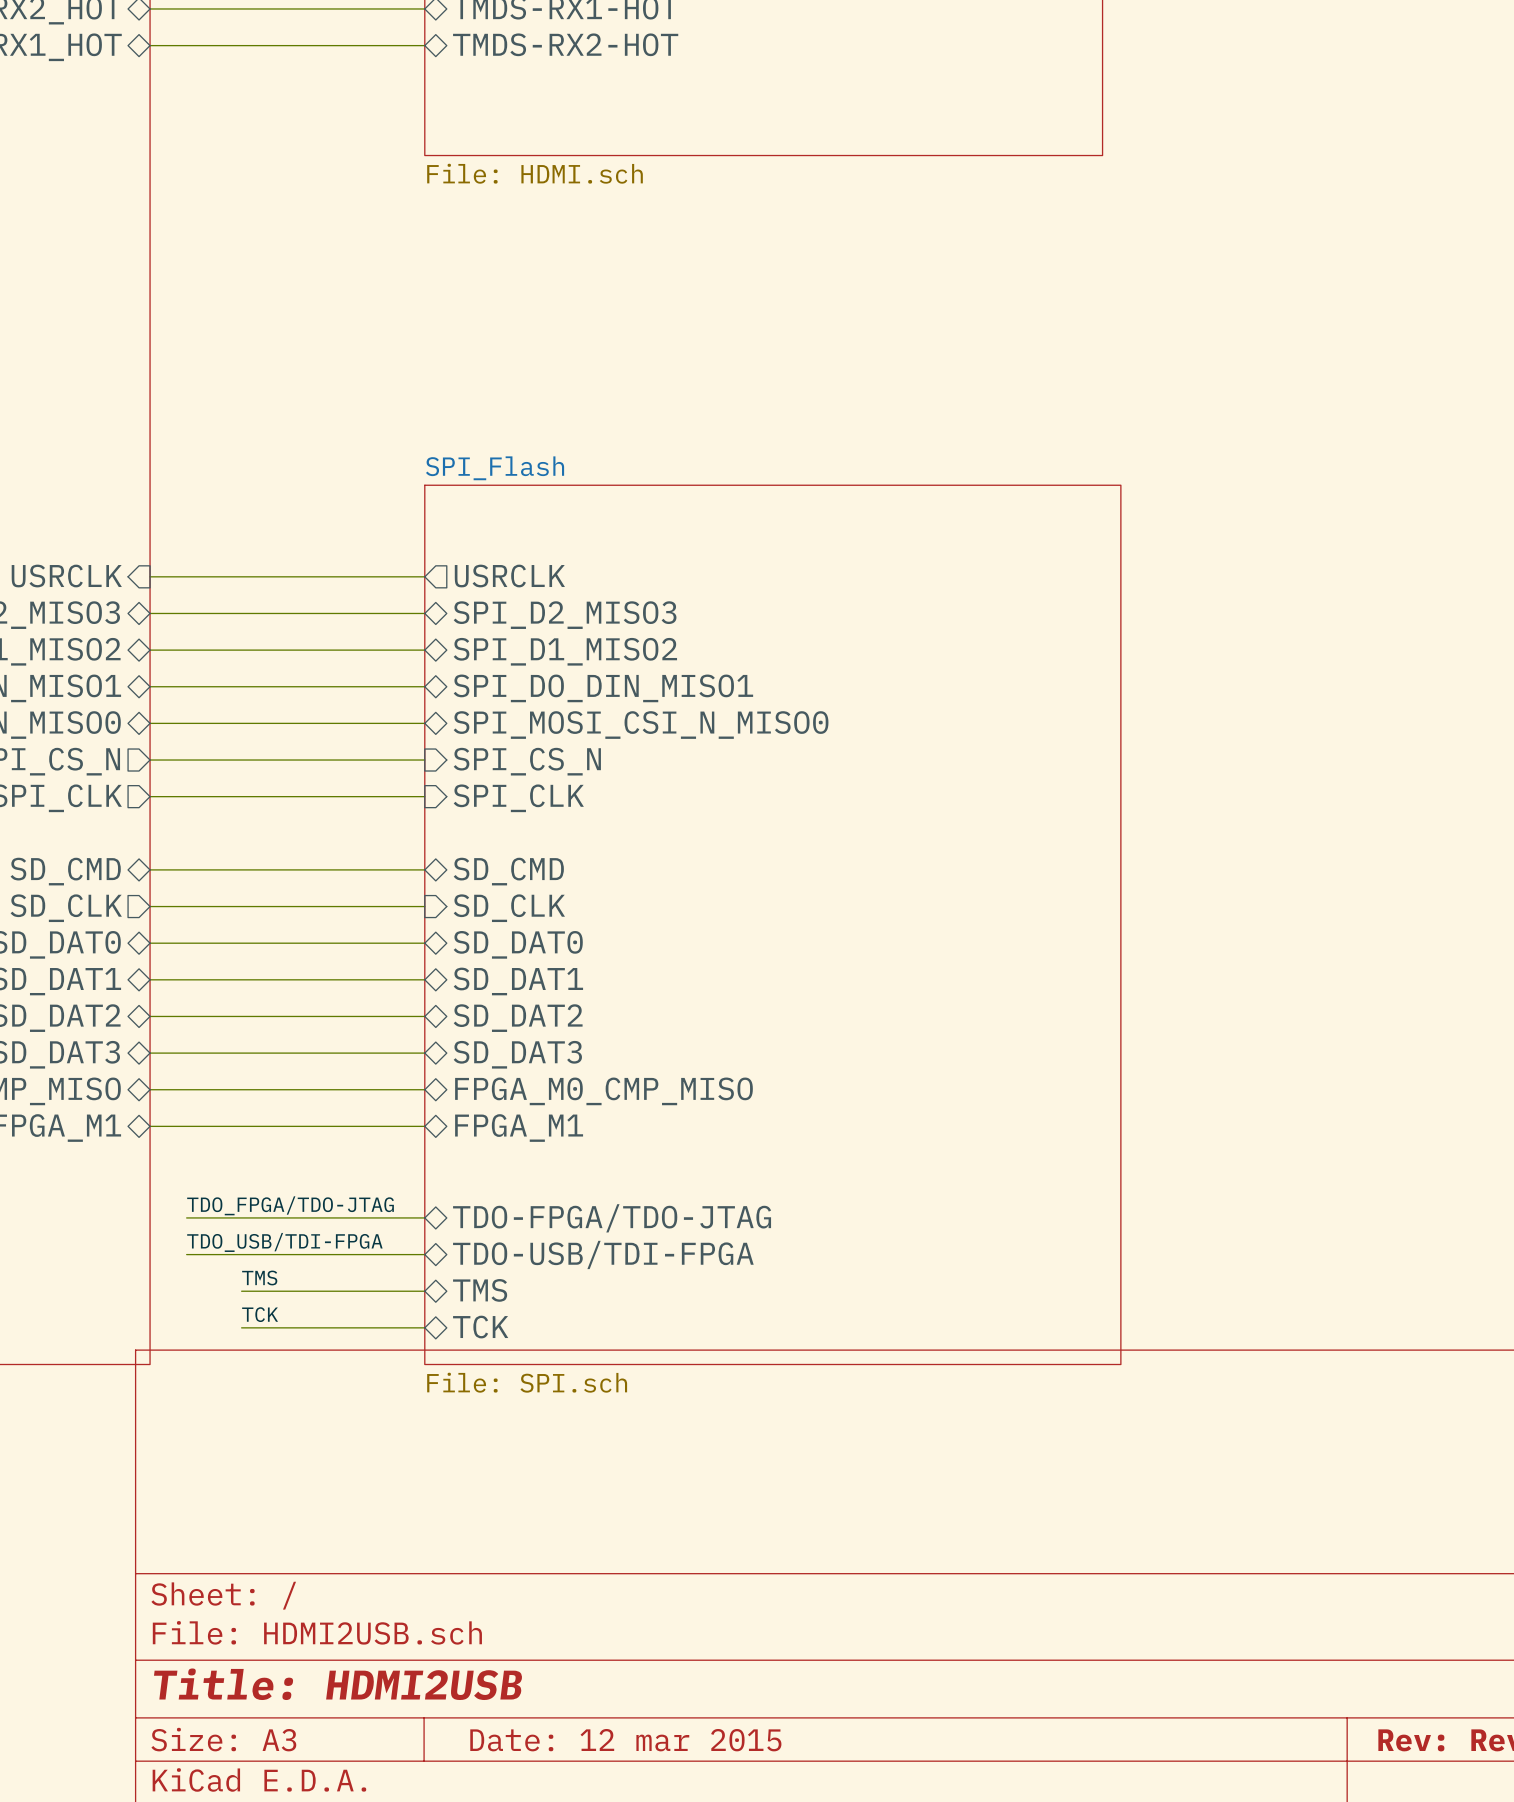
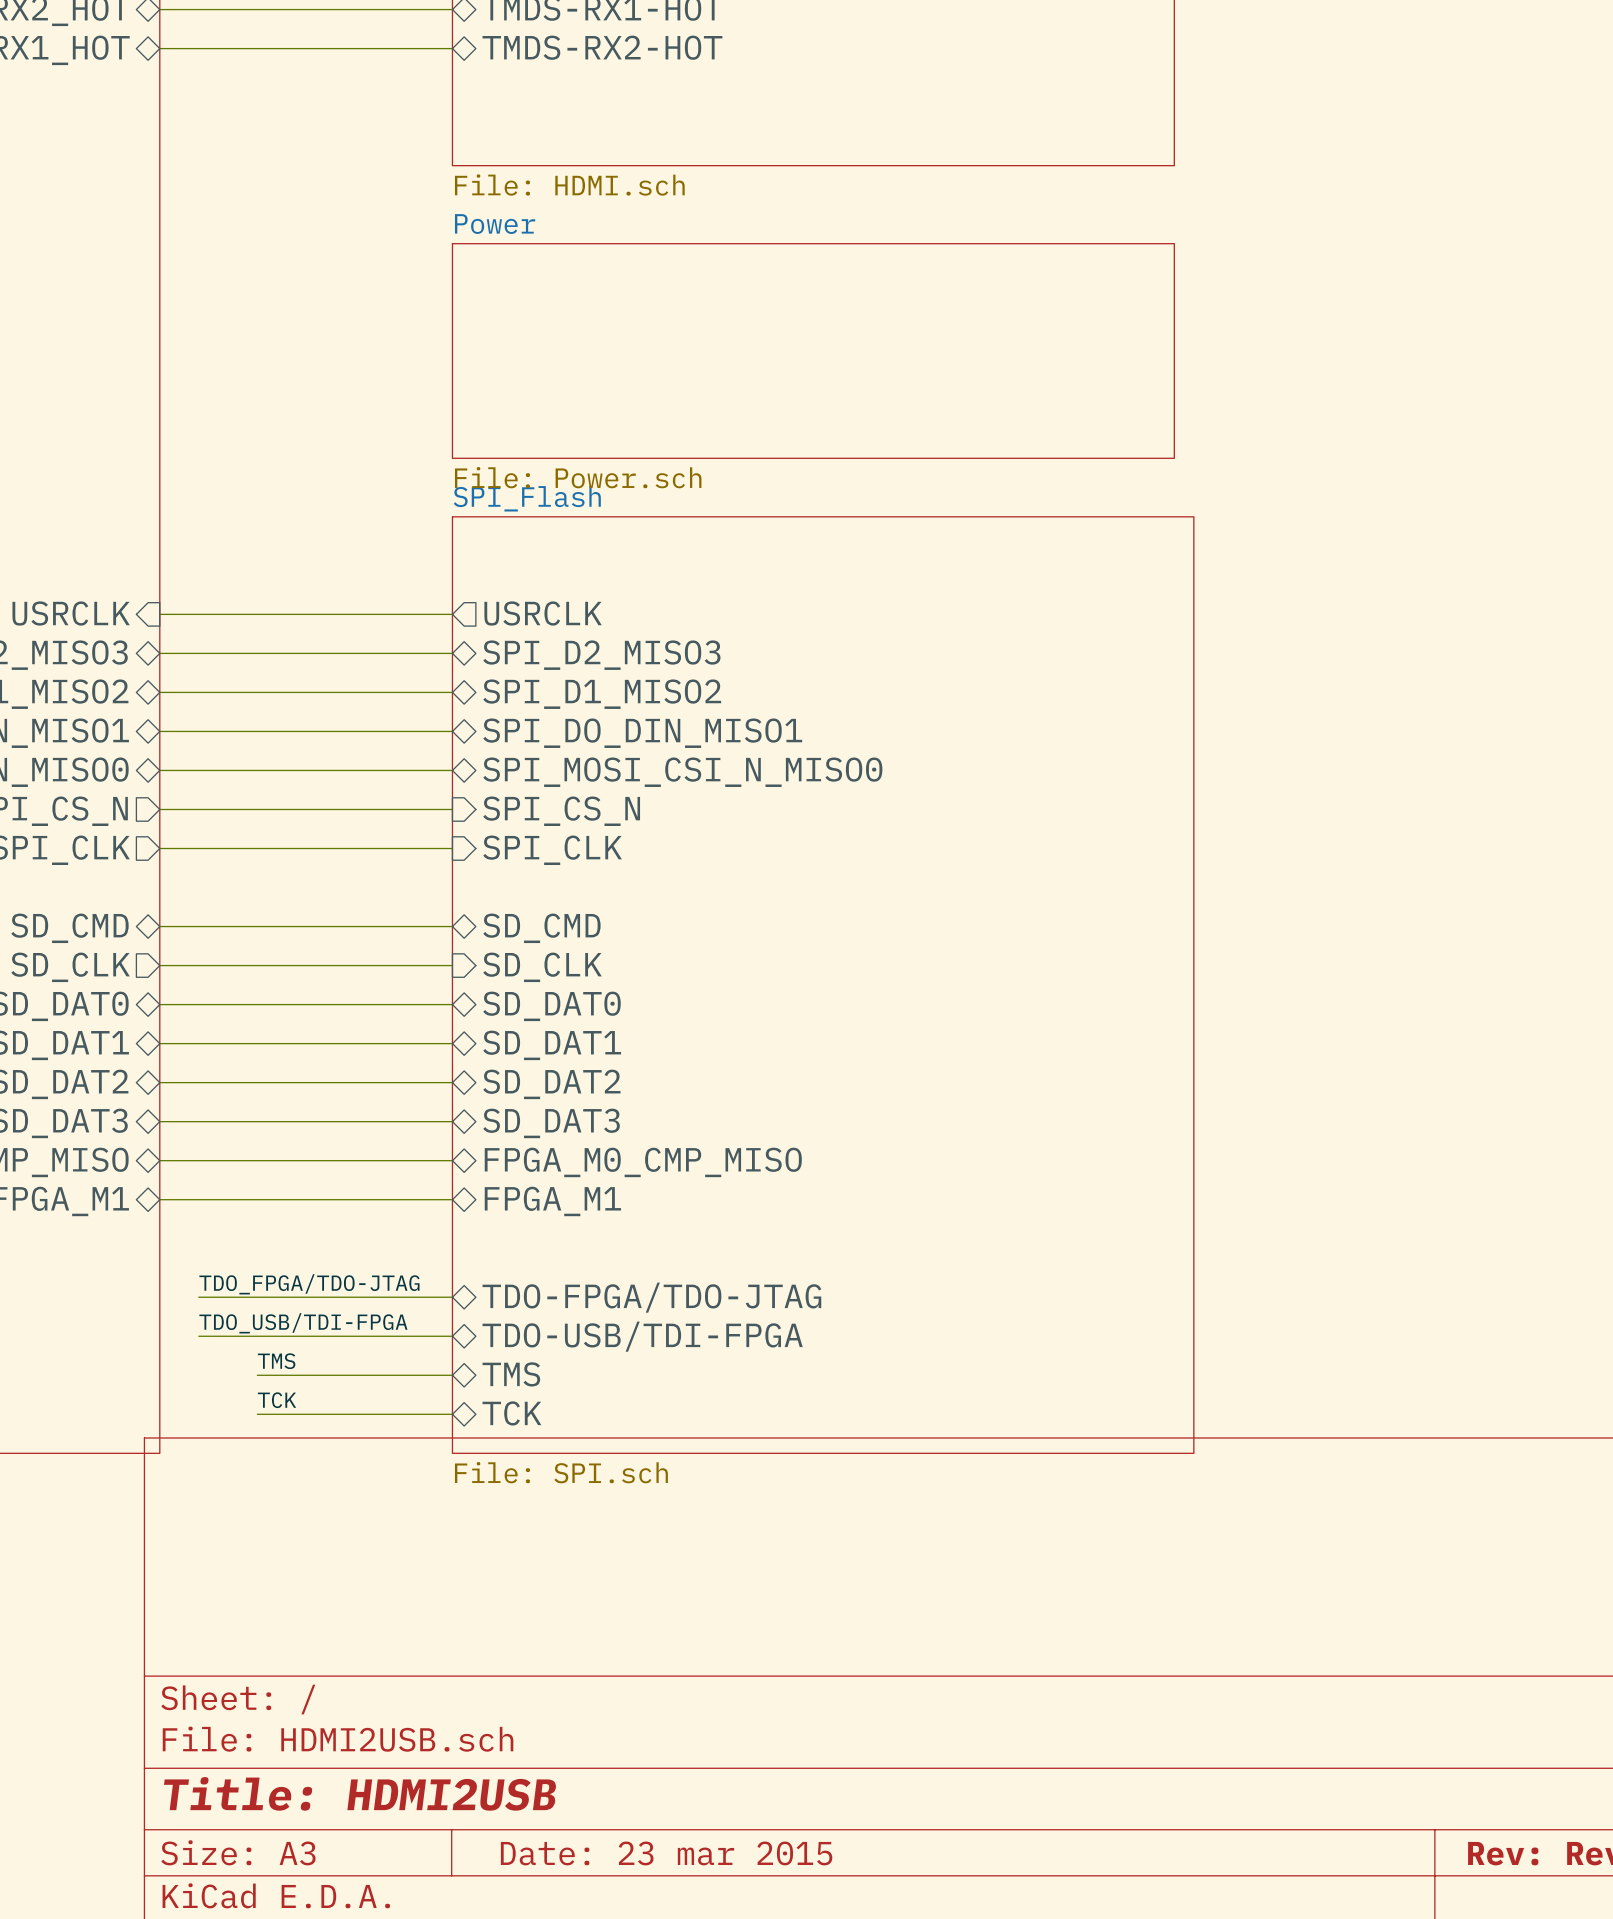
sheet Power: none -> File: Power.sch (813, 351)
title block: Date: 12 mar 2015 (625, 1740) -> Date: 23 mar 2015 (666, 1853)

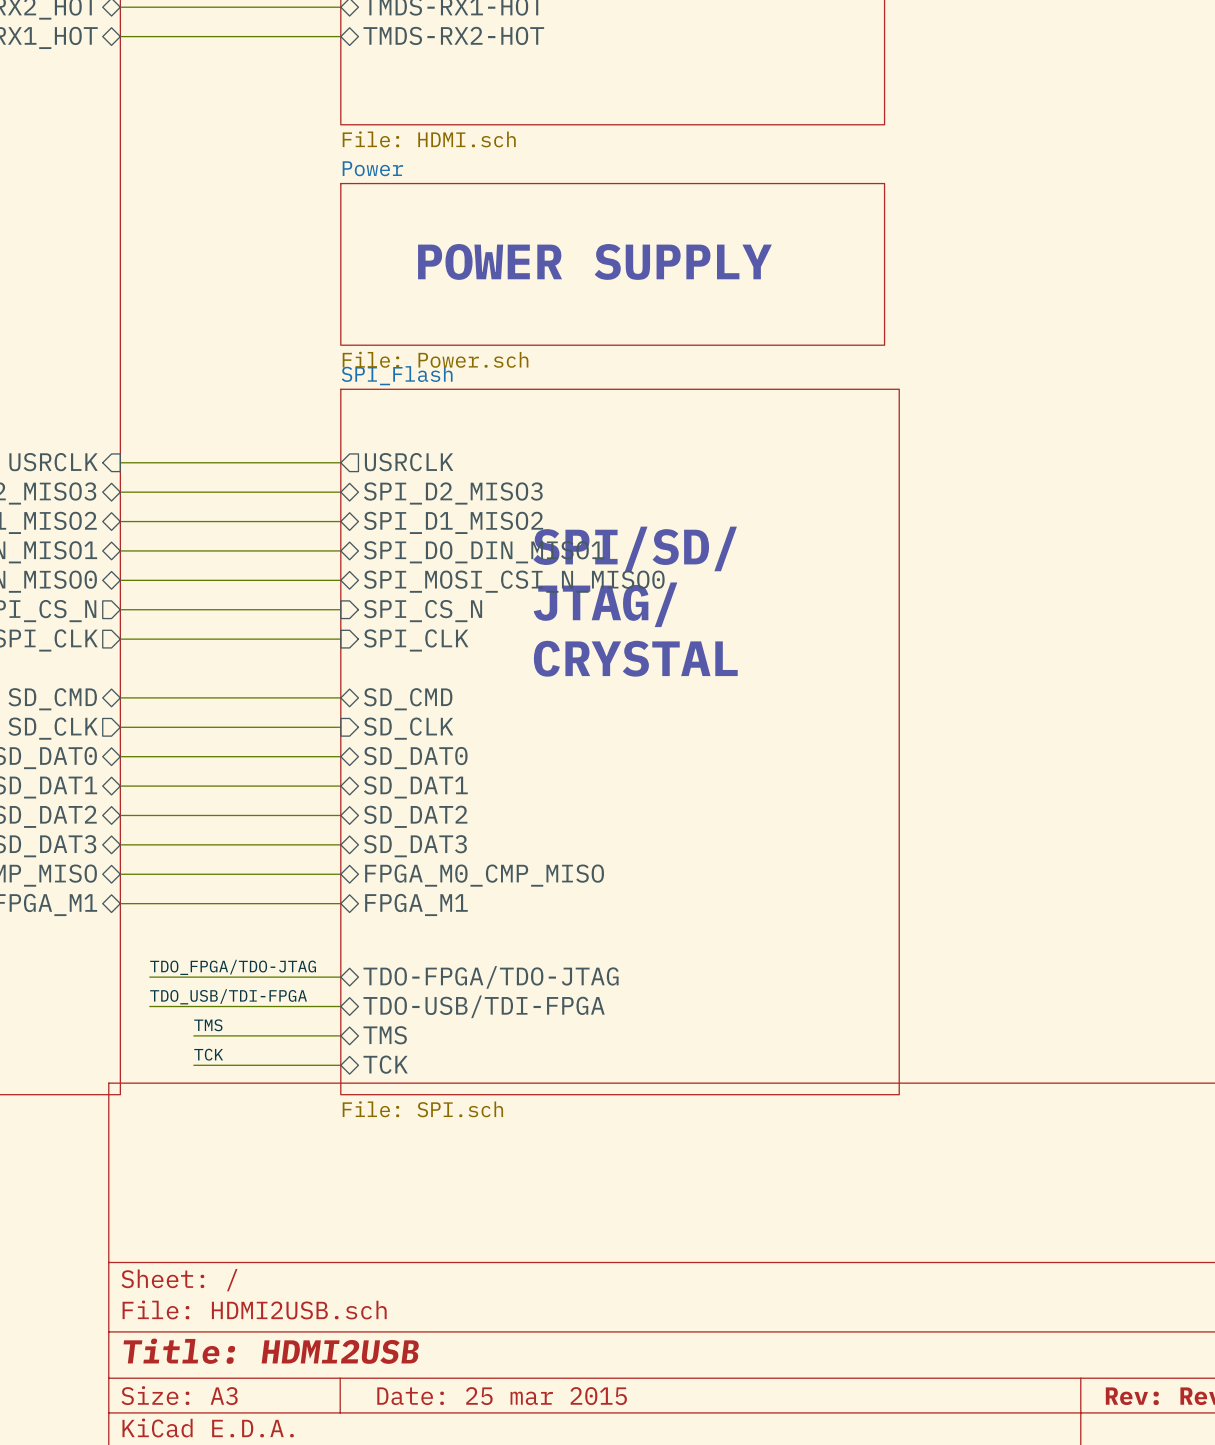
text: none -> POWER SUPPLY (594, 261)
text: none -> SPI/SD/ (635, 548)
text: none -> JTAG/ (605, 604)
text: none -> CRYSTAL (635, 658)
title block: Date: 23 mar 2015 (666, 1853) -> Date: 25 mar 2015 (502, 1396)

